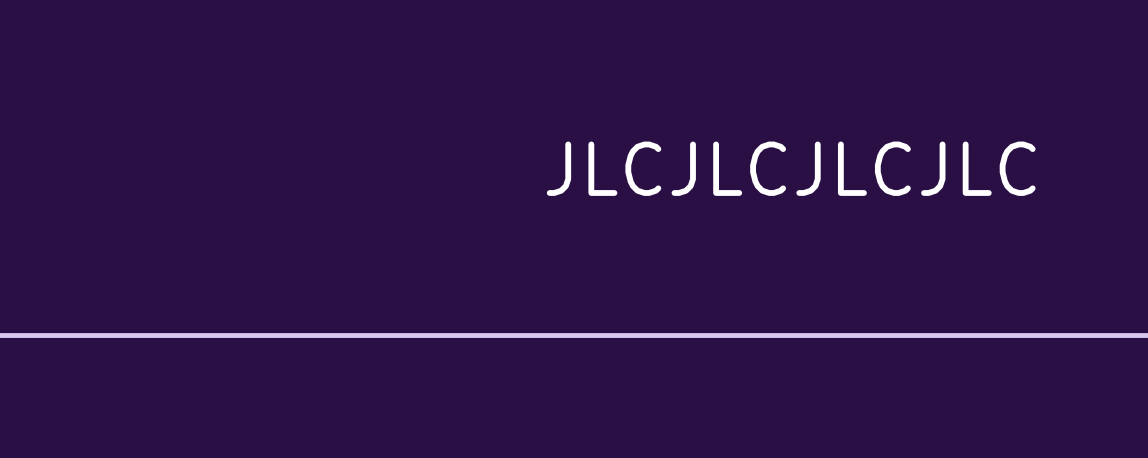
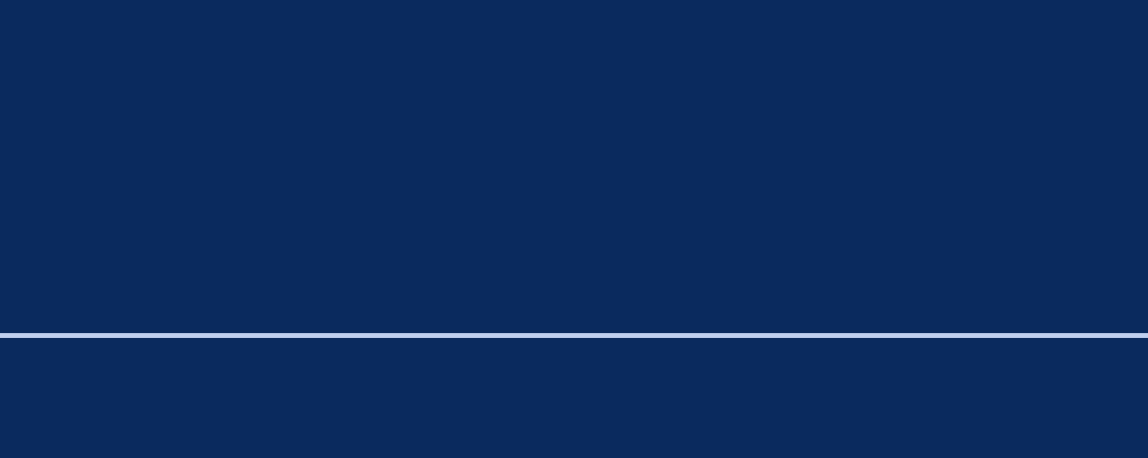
text: JLCJLCJLCJLC (791, 168) -> none

